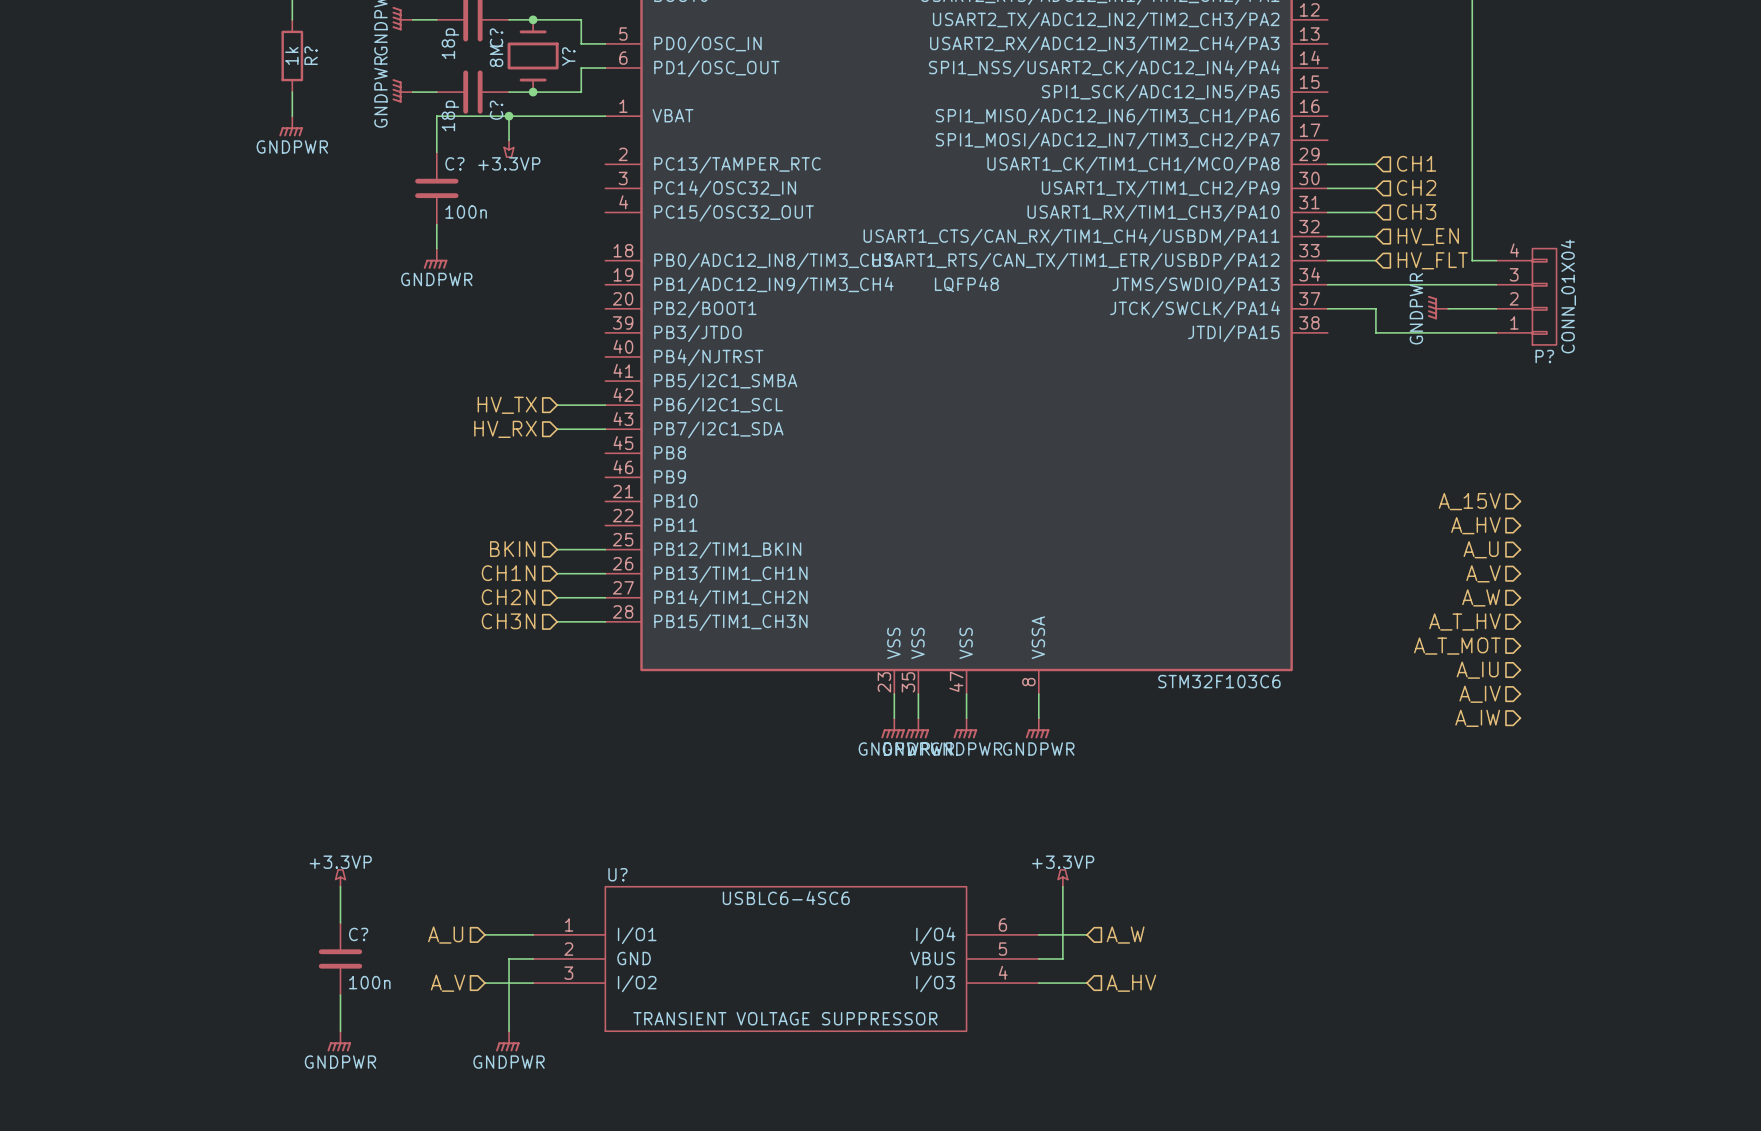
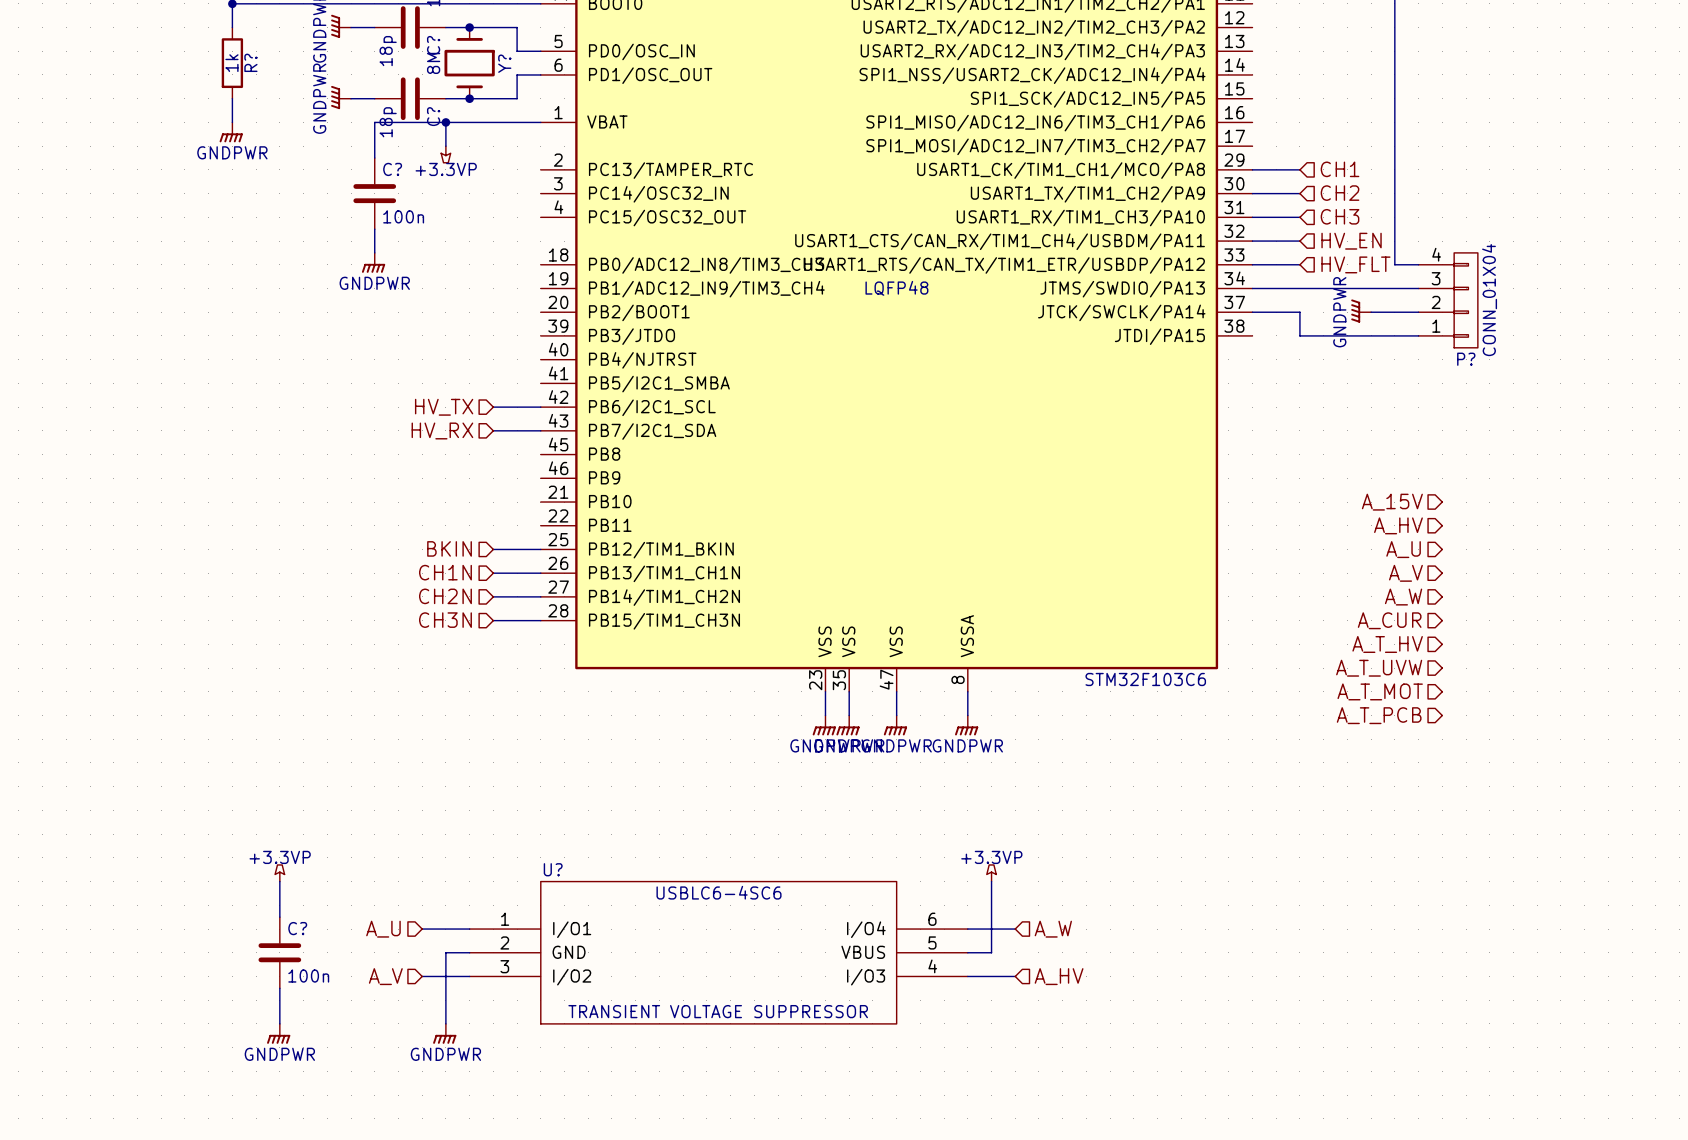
hierarchical label: A_T_HV (1464, 622) -> A_CUR (1389, 620)
hierarchical label: A_T_MOT (1457, 646) -> A_T_HV (1387, 644)
hierarchical label: A_IU (1477, 670) -> A_T_UVW (1379, 668)
hierarchical label: A_IV (1480, 694) -> A_T_MOT (1380, 691)
hierarchical label: A_IW (1477, 718) -> A_T_PCB (1379, 715)

